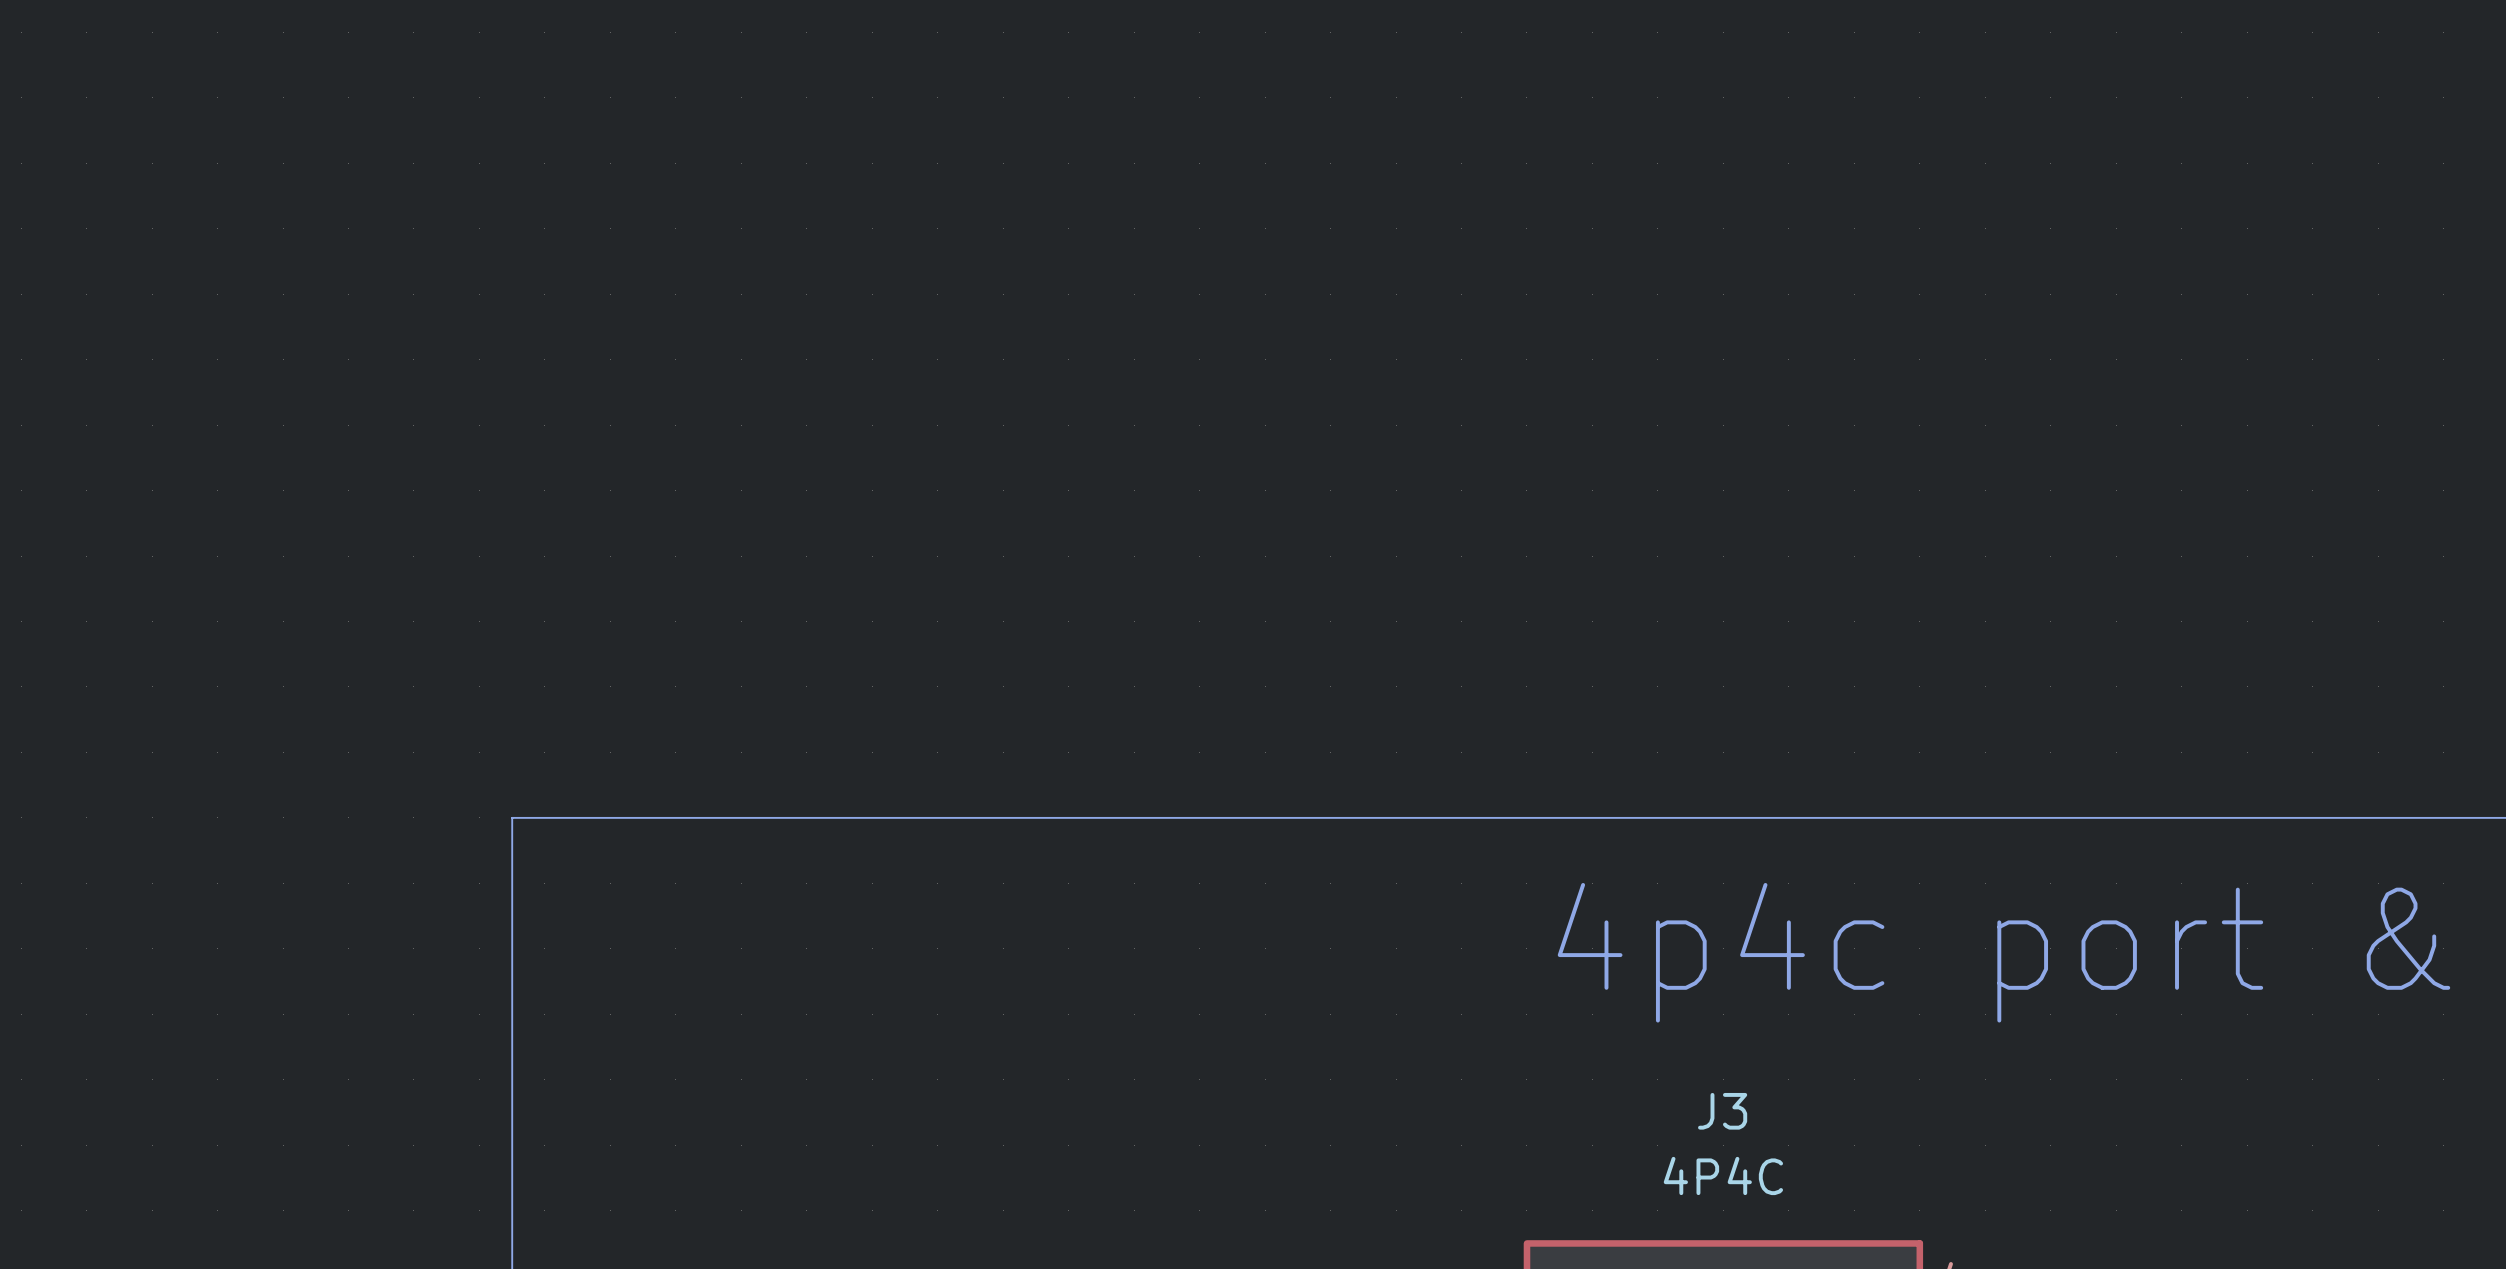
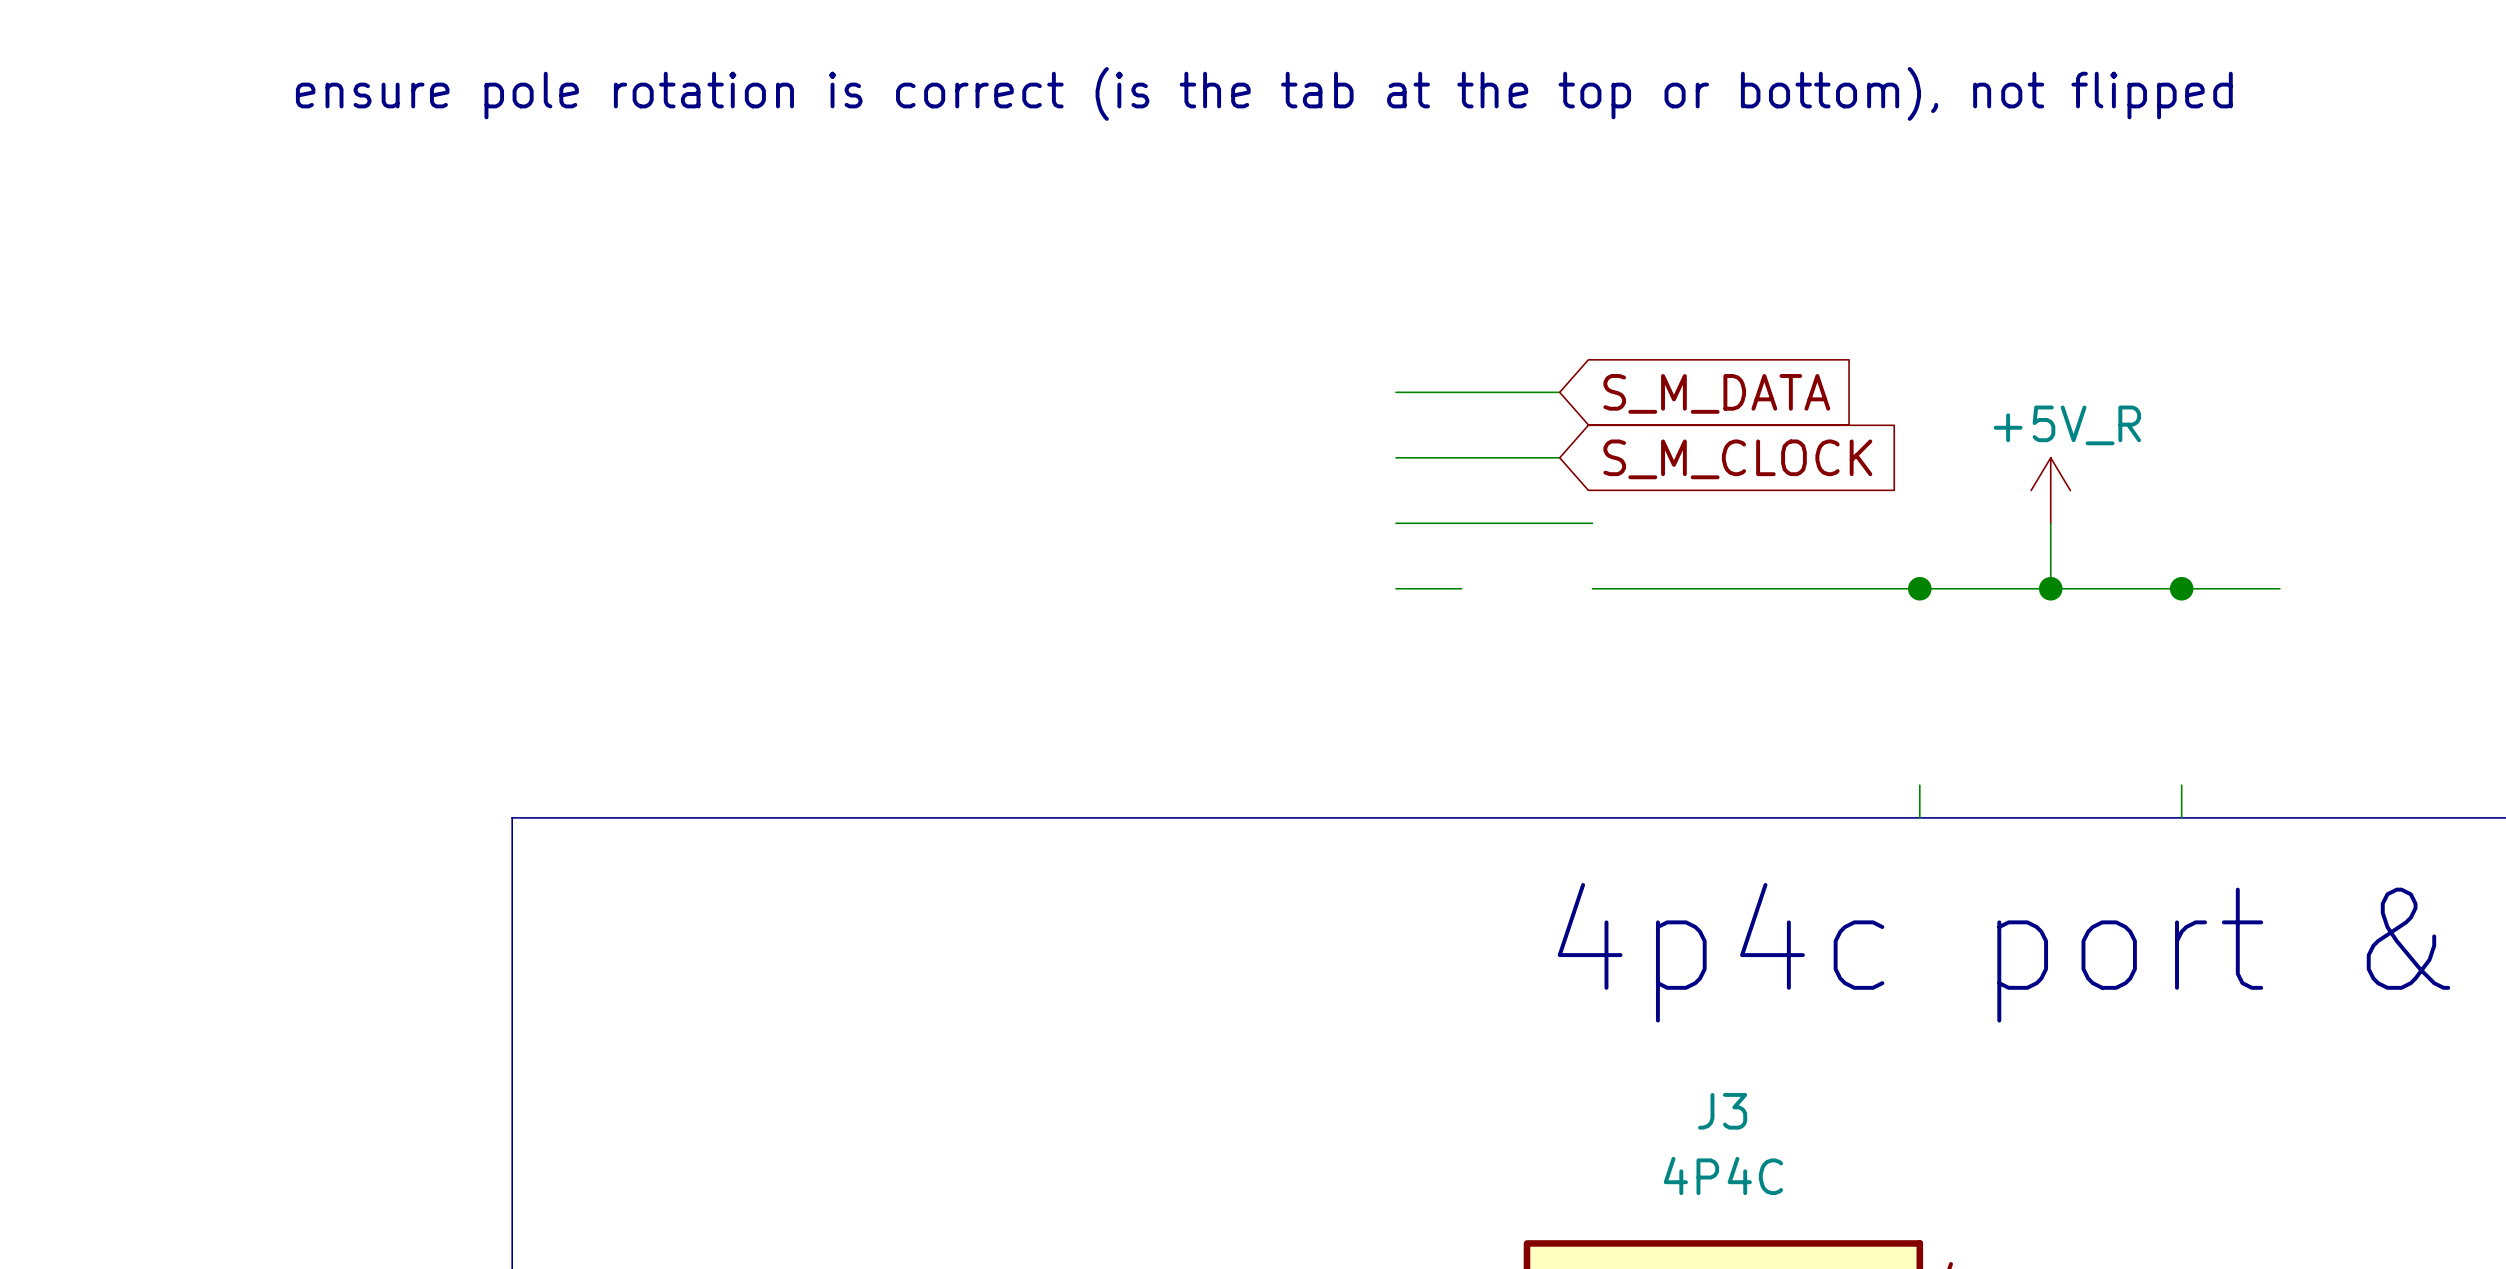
text: none -> ensure pole rotation is correct (is the tab at the top or bottom), not flipped (1264, 93)
wire: none -> (1396, 392) (1559, 392)
global label: none -> S_M_DATA (1716, 393)
wire: none -> (1396, 457) (1559, 457)
global label: none -> S_M_CLOCK (1737, 459)
power symbol: none -> +5V_R (2050, 490)
wire: none -> (1396, 523) (1592, 523)
wire: none -> (2050, 523) (2050, 588)
wire: none -> (1396, 588) (1461, 588)
wire: none -> (1592, 588) (2279, 588)
junction: none -> (1919, 588)
junction: none -> (2050, 588)
junction: none -> (2181, 588)
wire: none -> (1919, 785) (1919, 817)
wire: none -> (2181, 785) (2181, 817)

